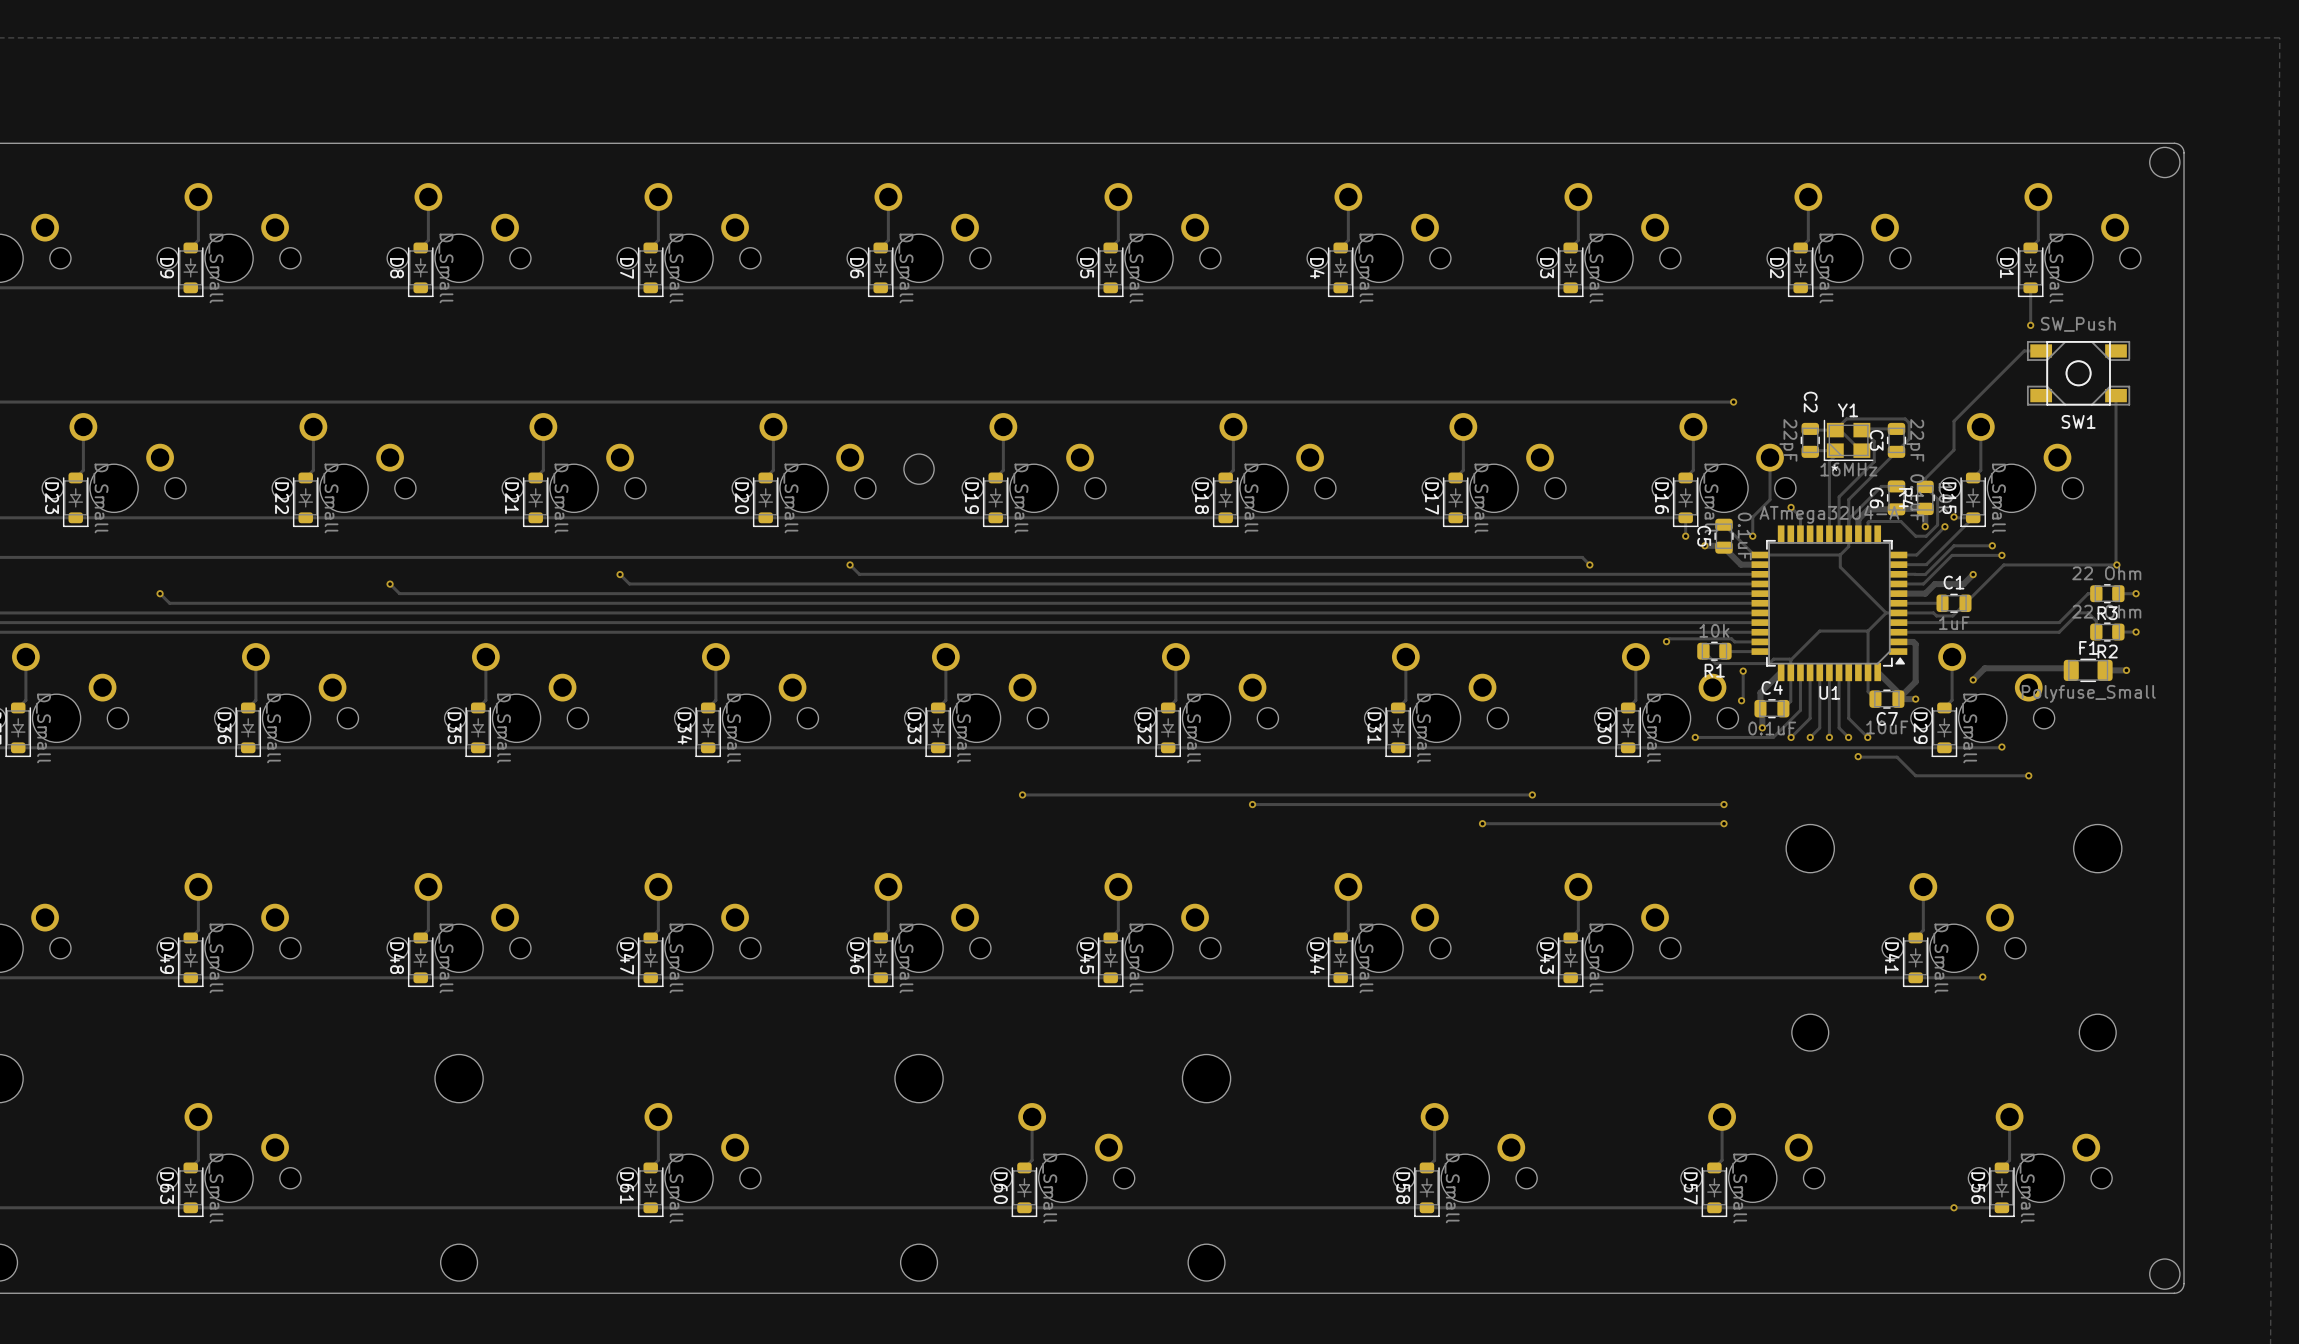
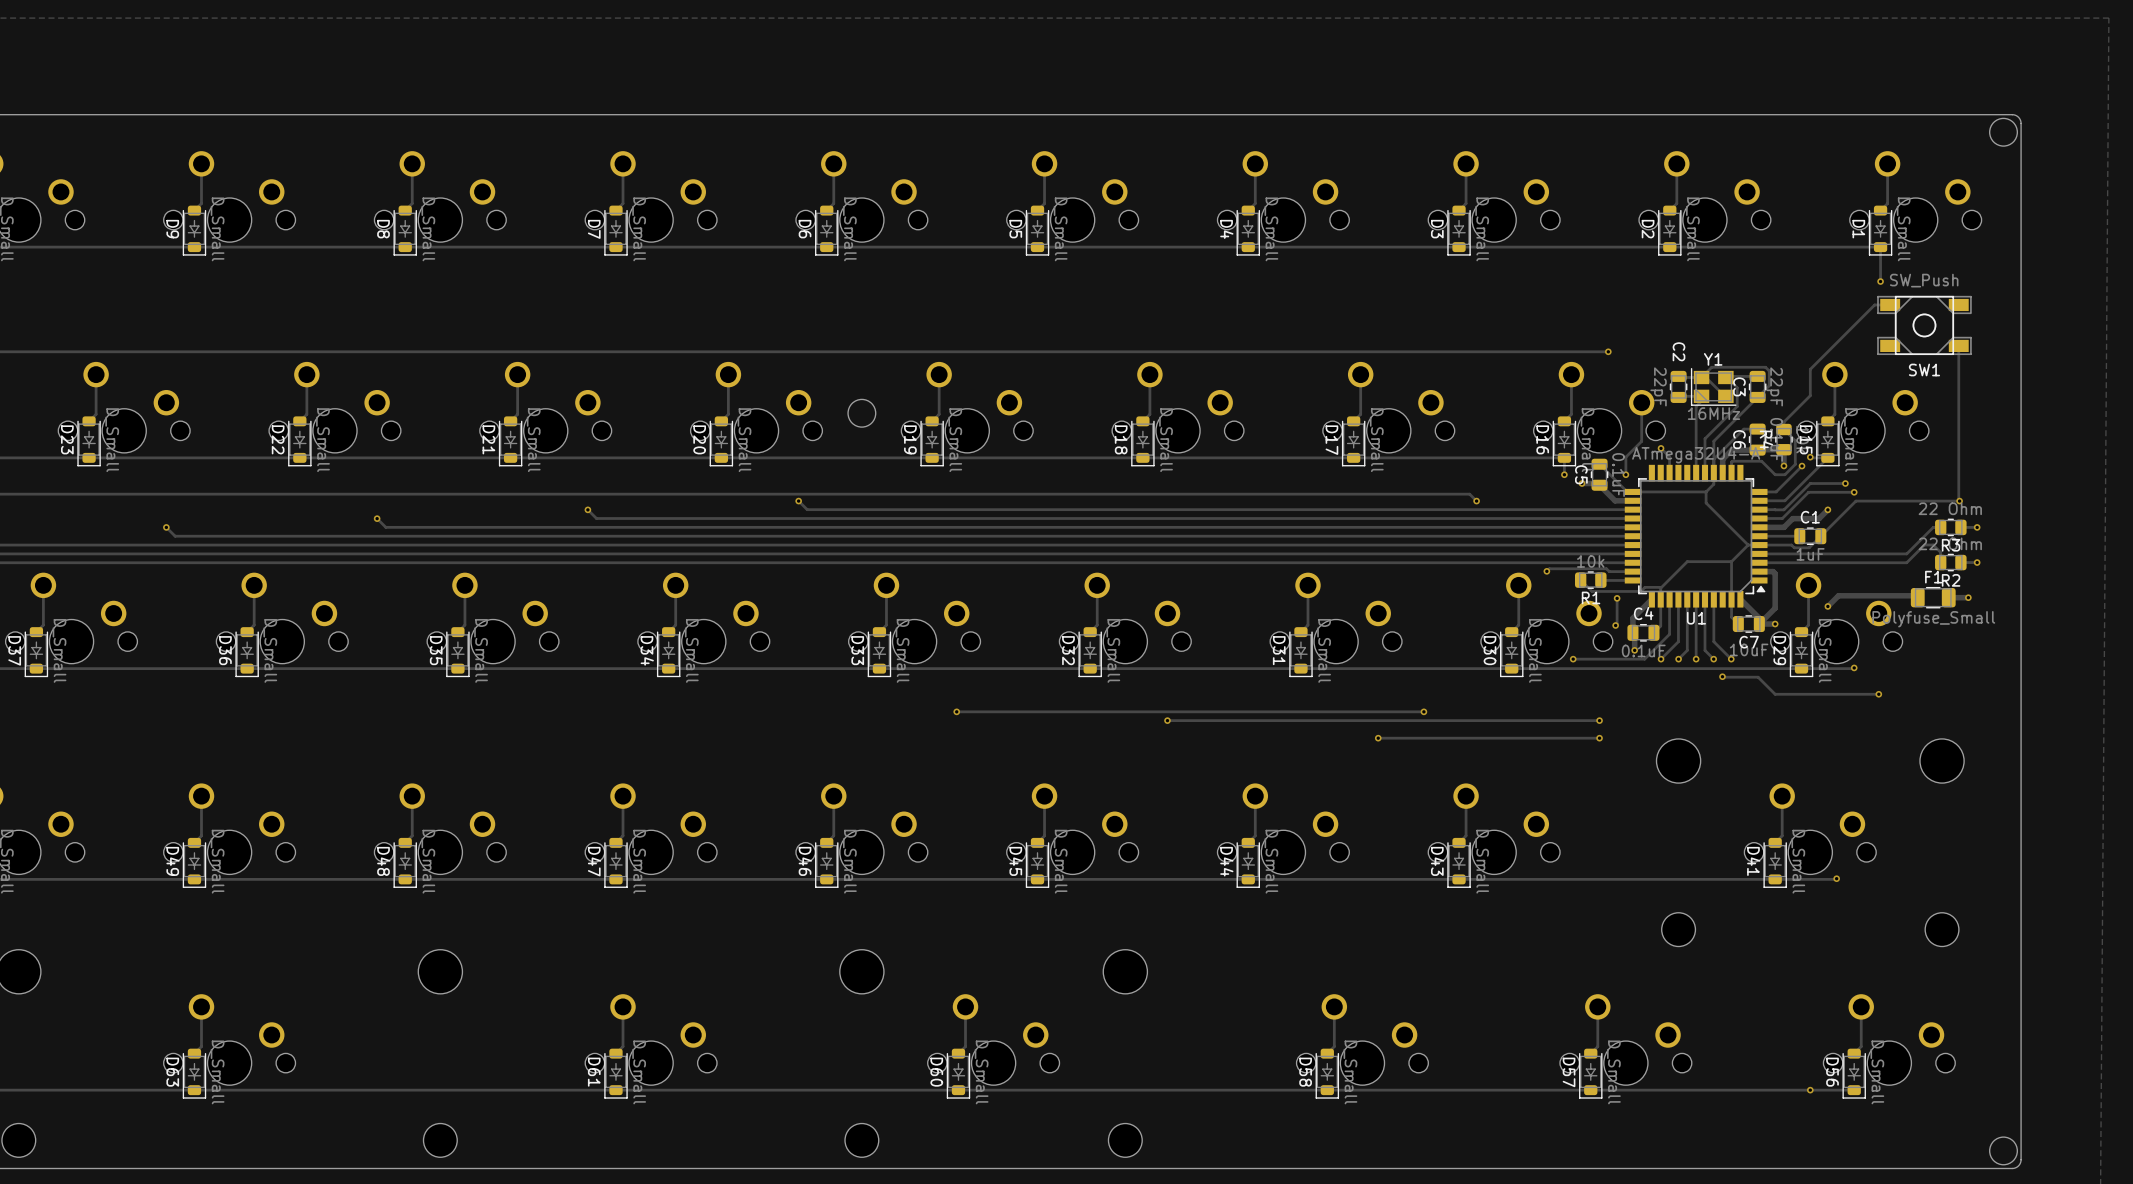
text: * (1834, 467) -> none

